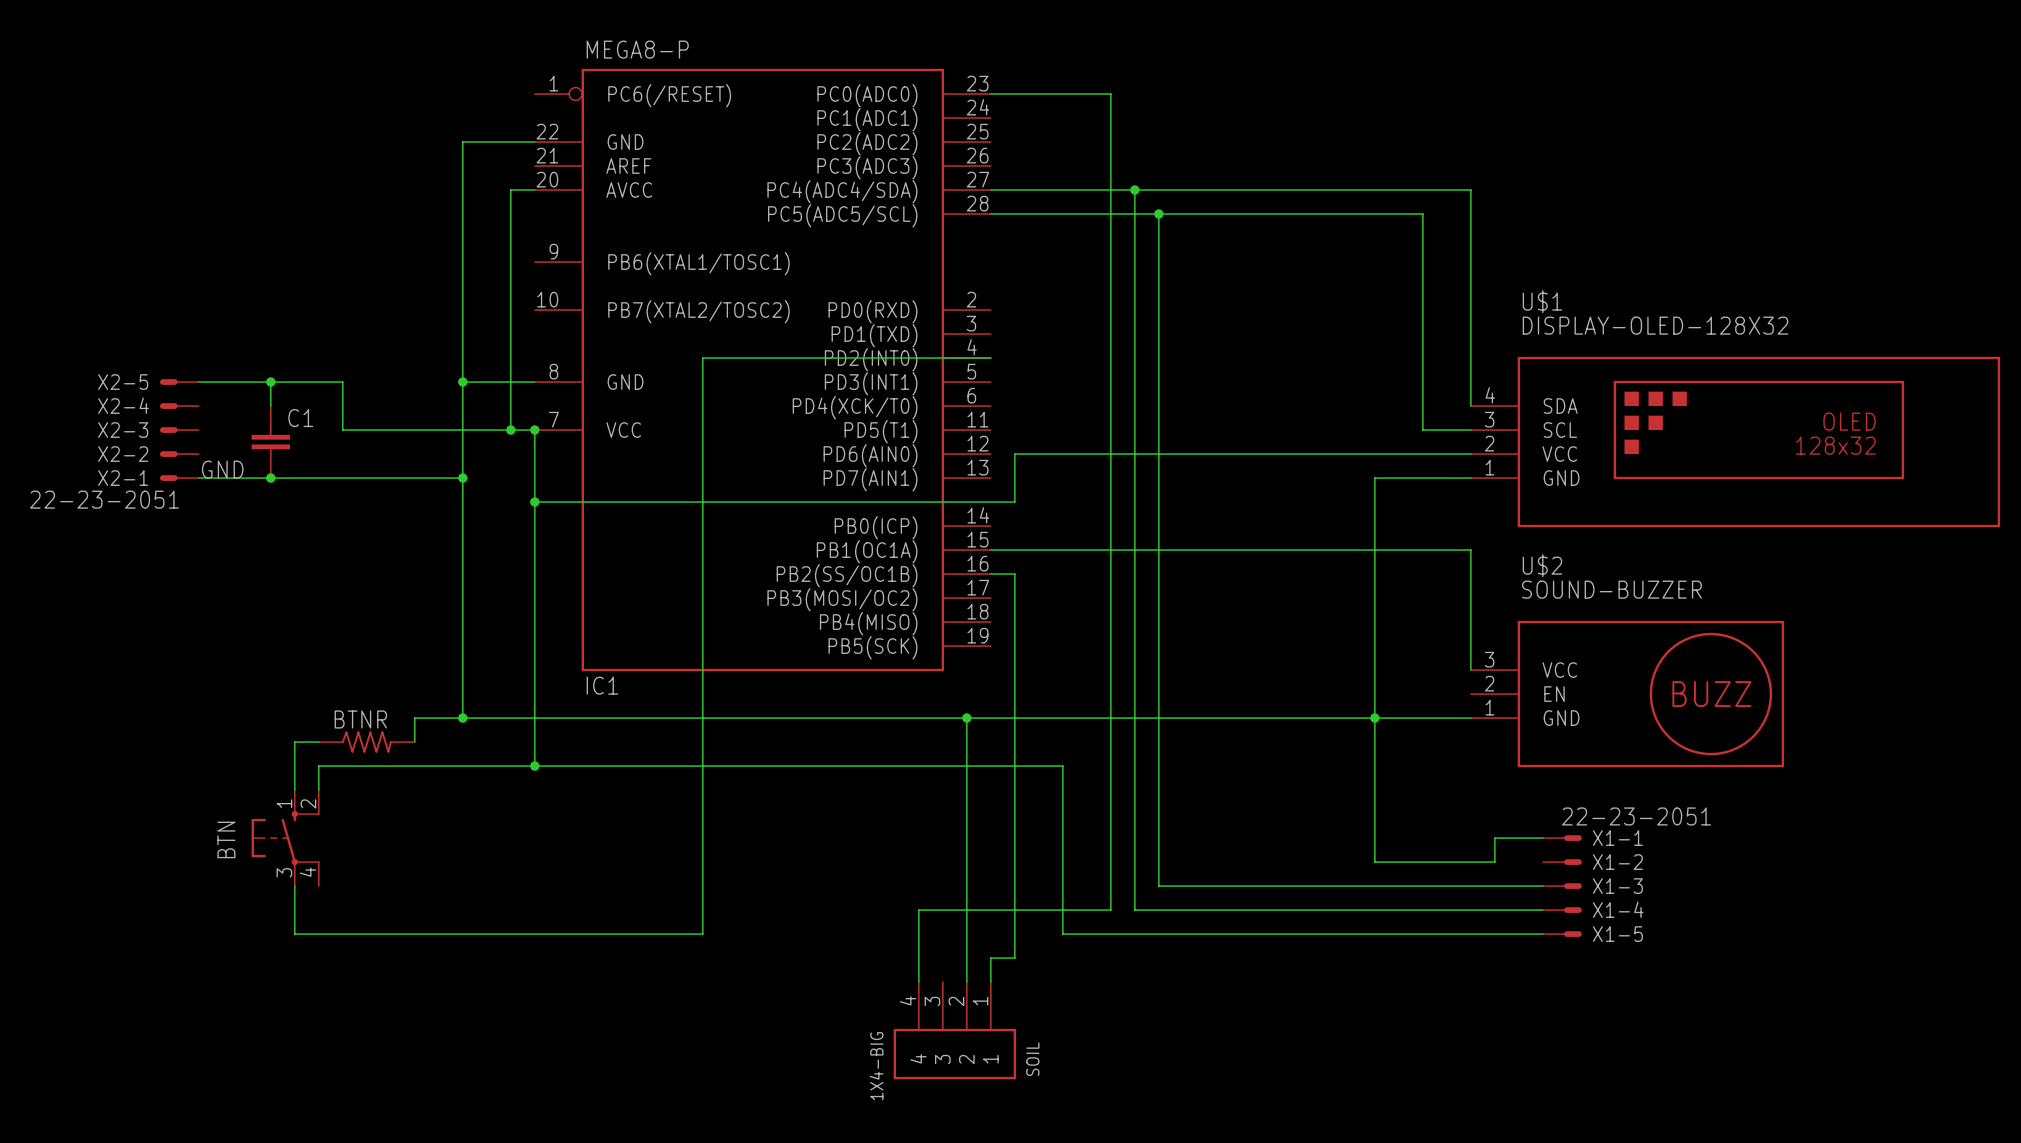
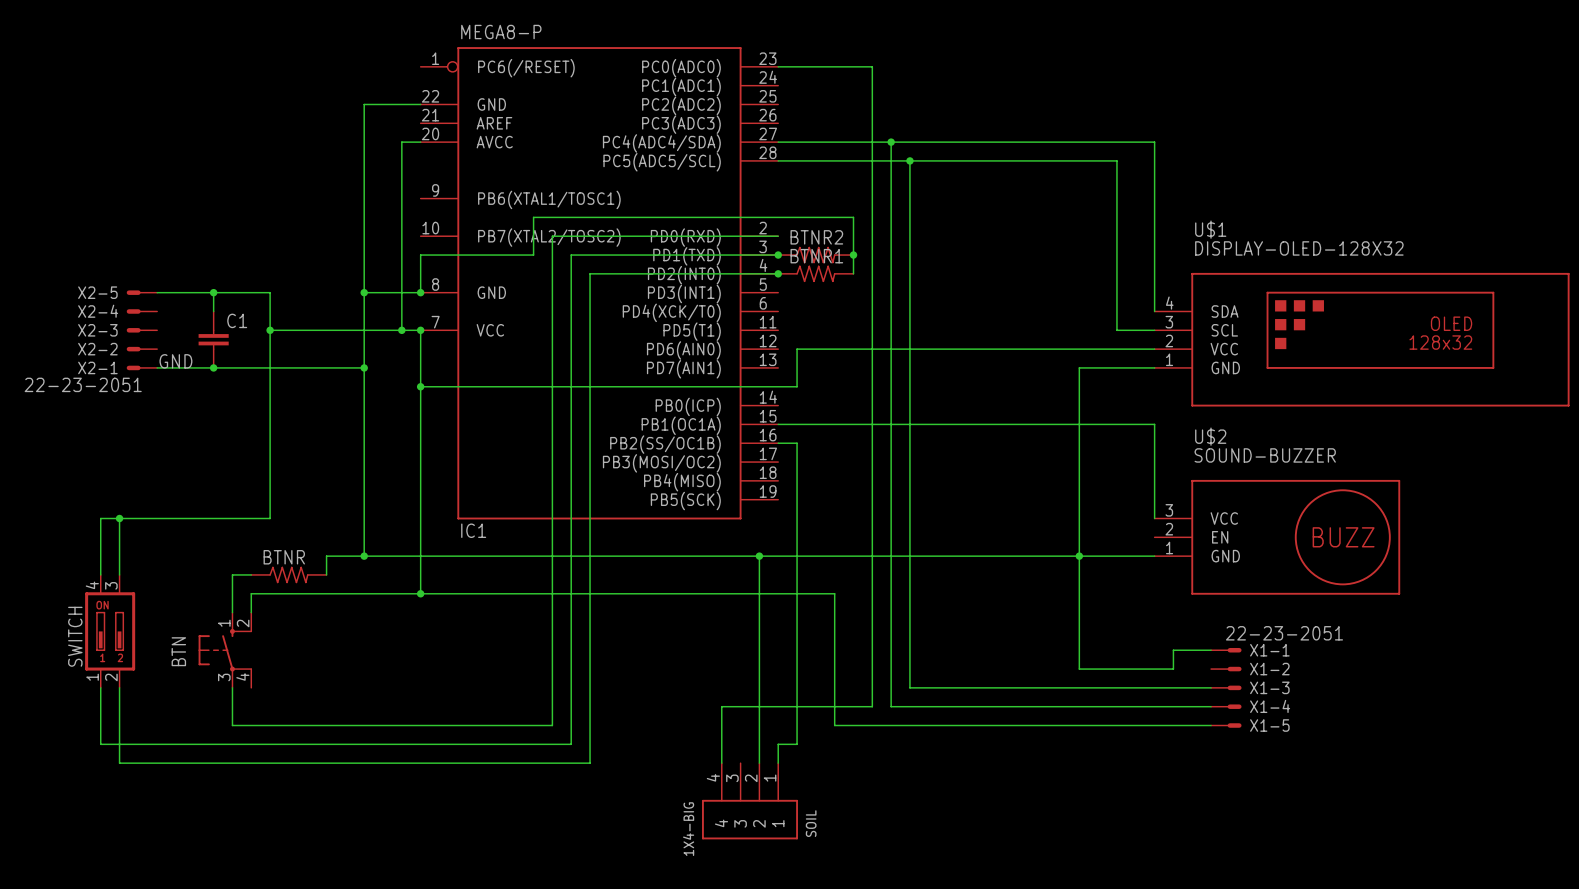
wire: none -> (778, 255) (571, 255) (571, 744) (100, 744) (100, 687)
junction: none -> (778, 255)
BTNR2: none -> (815, 255)
junction: none -> (853, 255)
wire: (702, 358) (750, 358) -> (552, 273) (552, 236) (778, 236)
wire: none -> (590, 273) (590, 763) (119, 763) (119, 687)
junction: none -> (778, 273)
BTNR1: none -> (815, 273)
wire: none -> (853, 273) (853, 217) (533, 217) (533, 255) (420, 255) (420, 292)
junction: none -> (420, 292)
wire: none -> (270, 330) (270, 518) (100, 518) (100, 574)
junction: none -> (270, 330)
wire: none -> (119, 518) (119, 574)
junction: none -> (119, 518)
SWITCH: none -> (110, 631)

